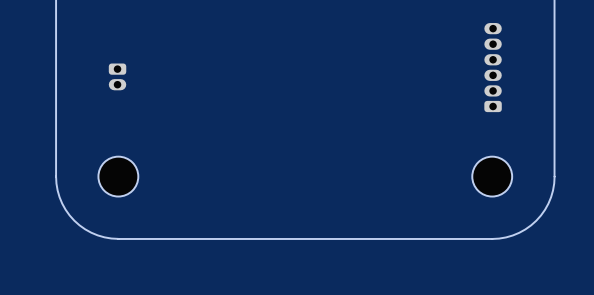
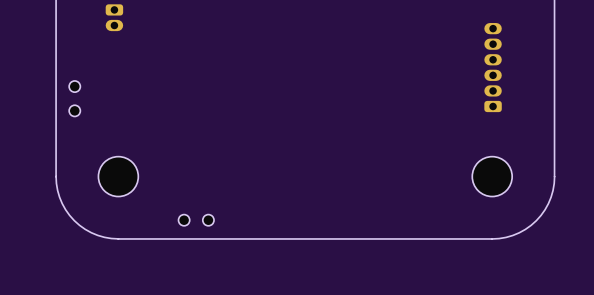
part position: (117, 76) -> (114, 17)
part: none -> (74, 98)
part: none -> (196, 220)

